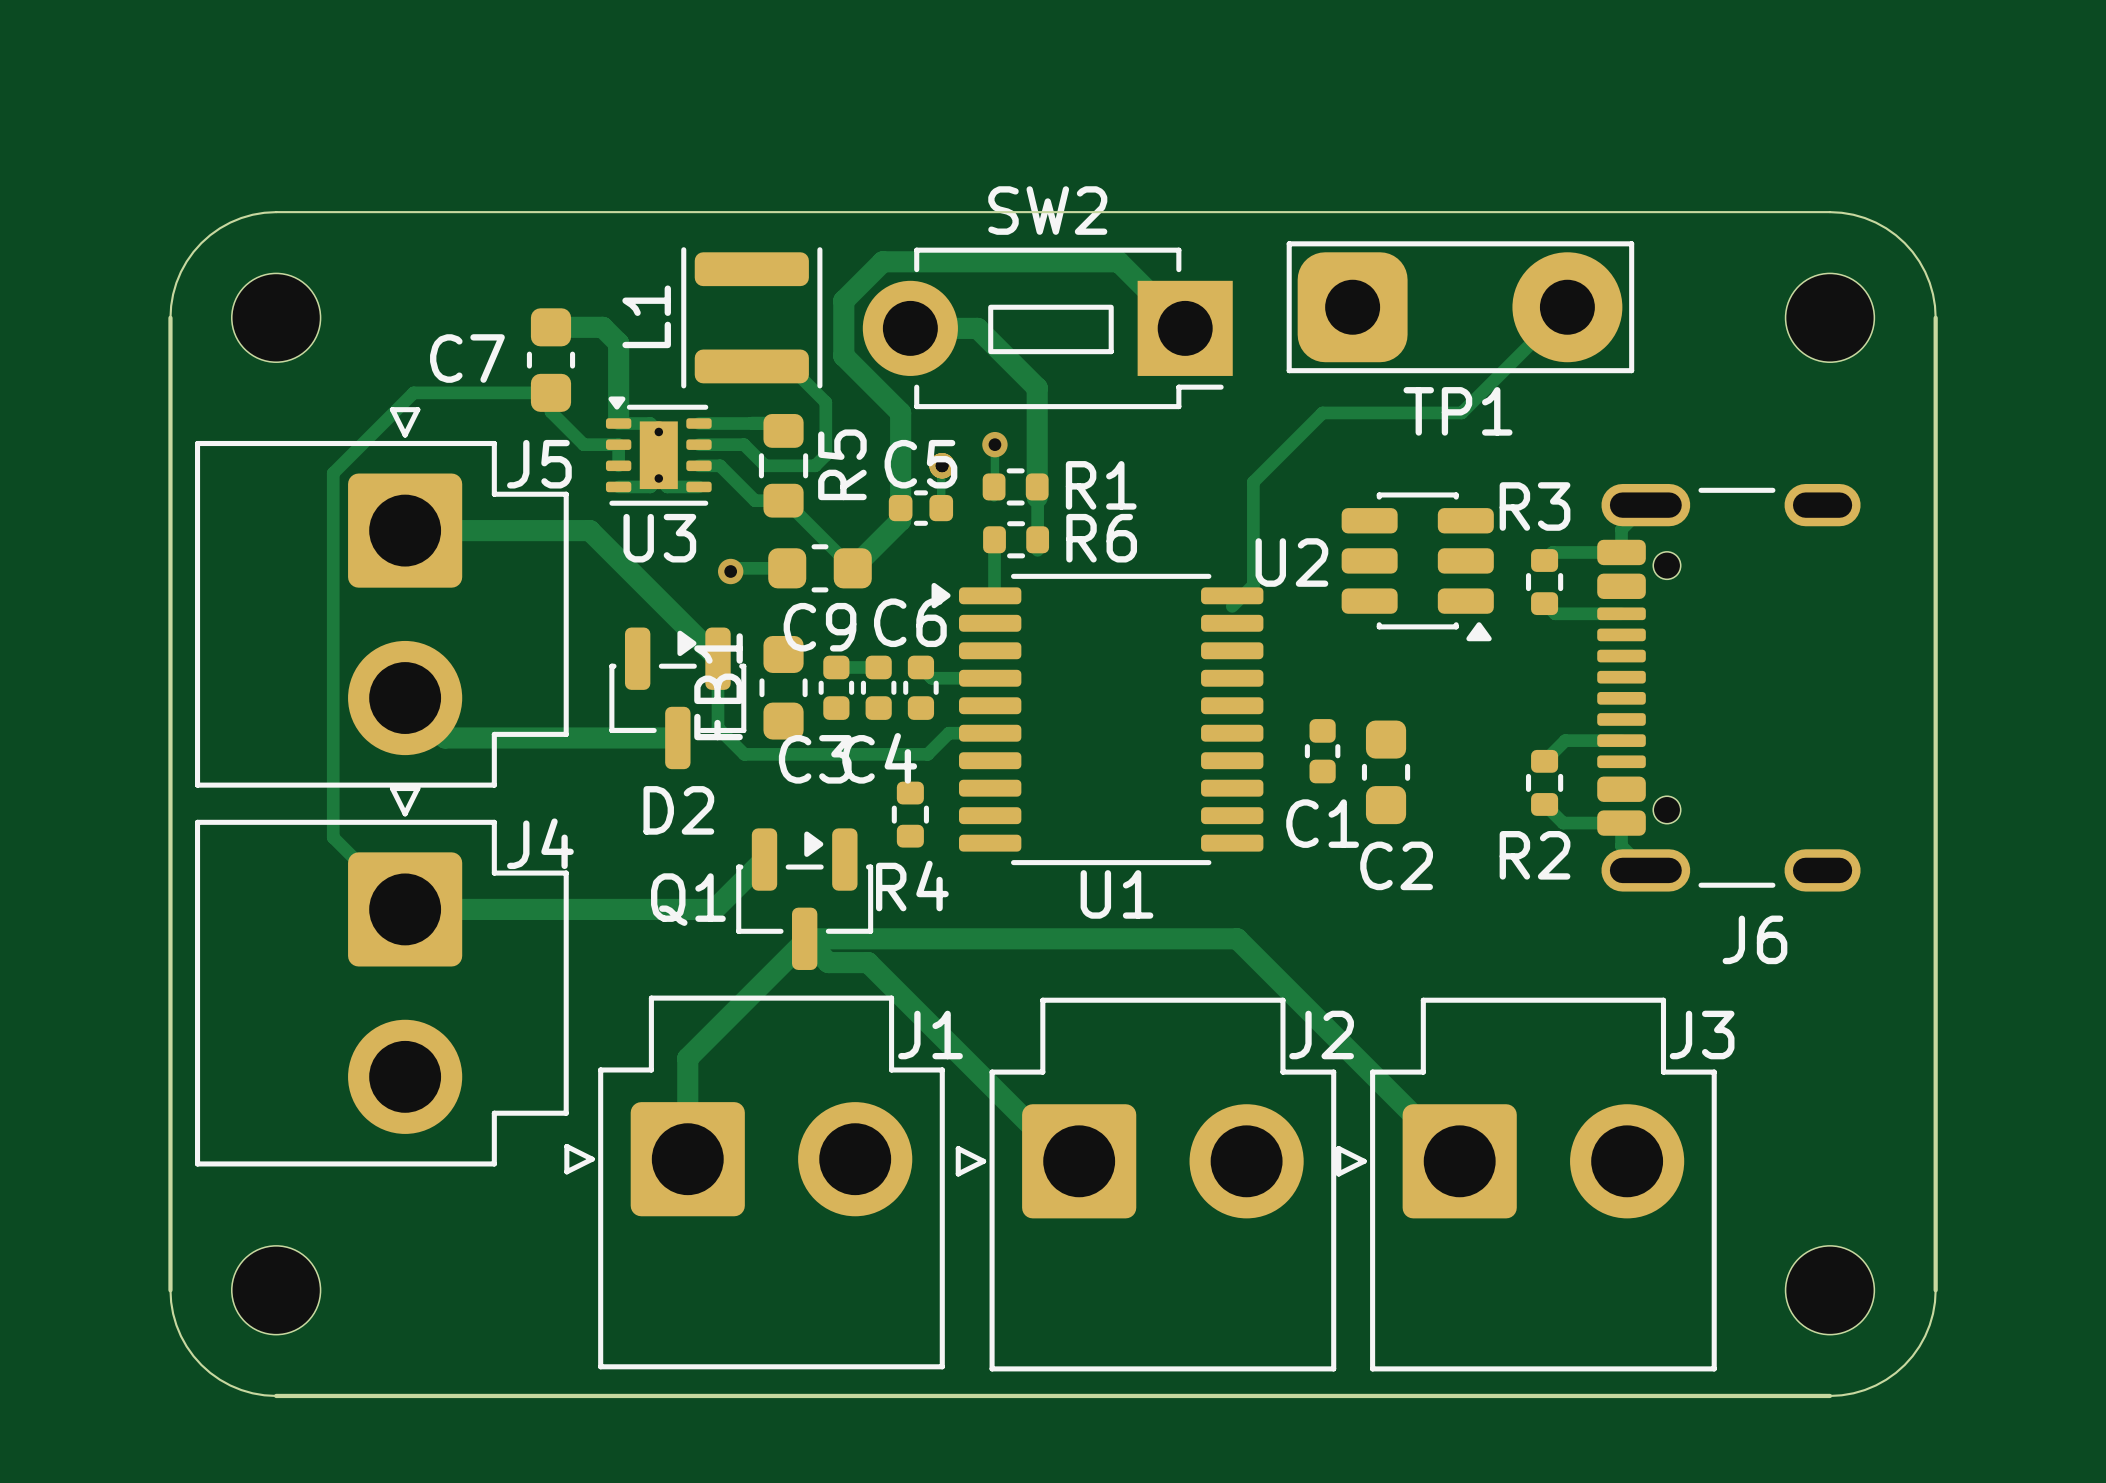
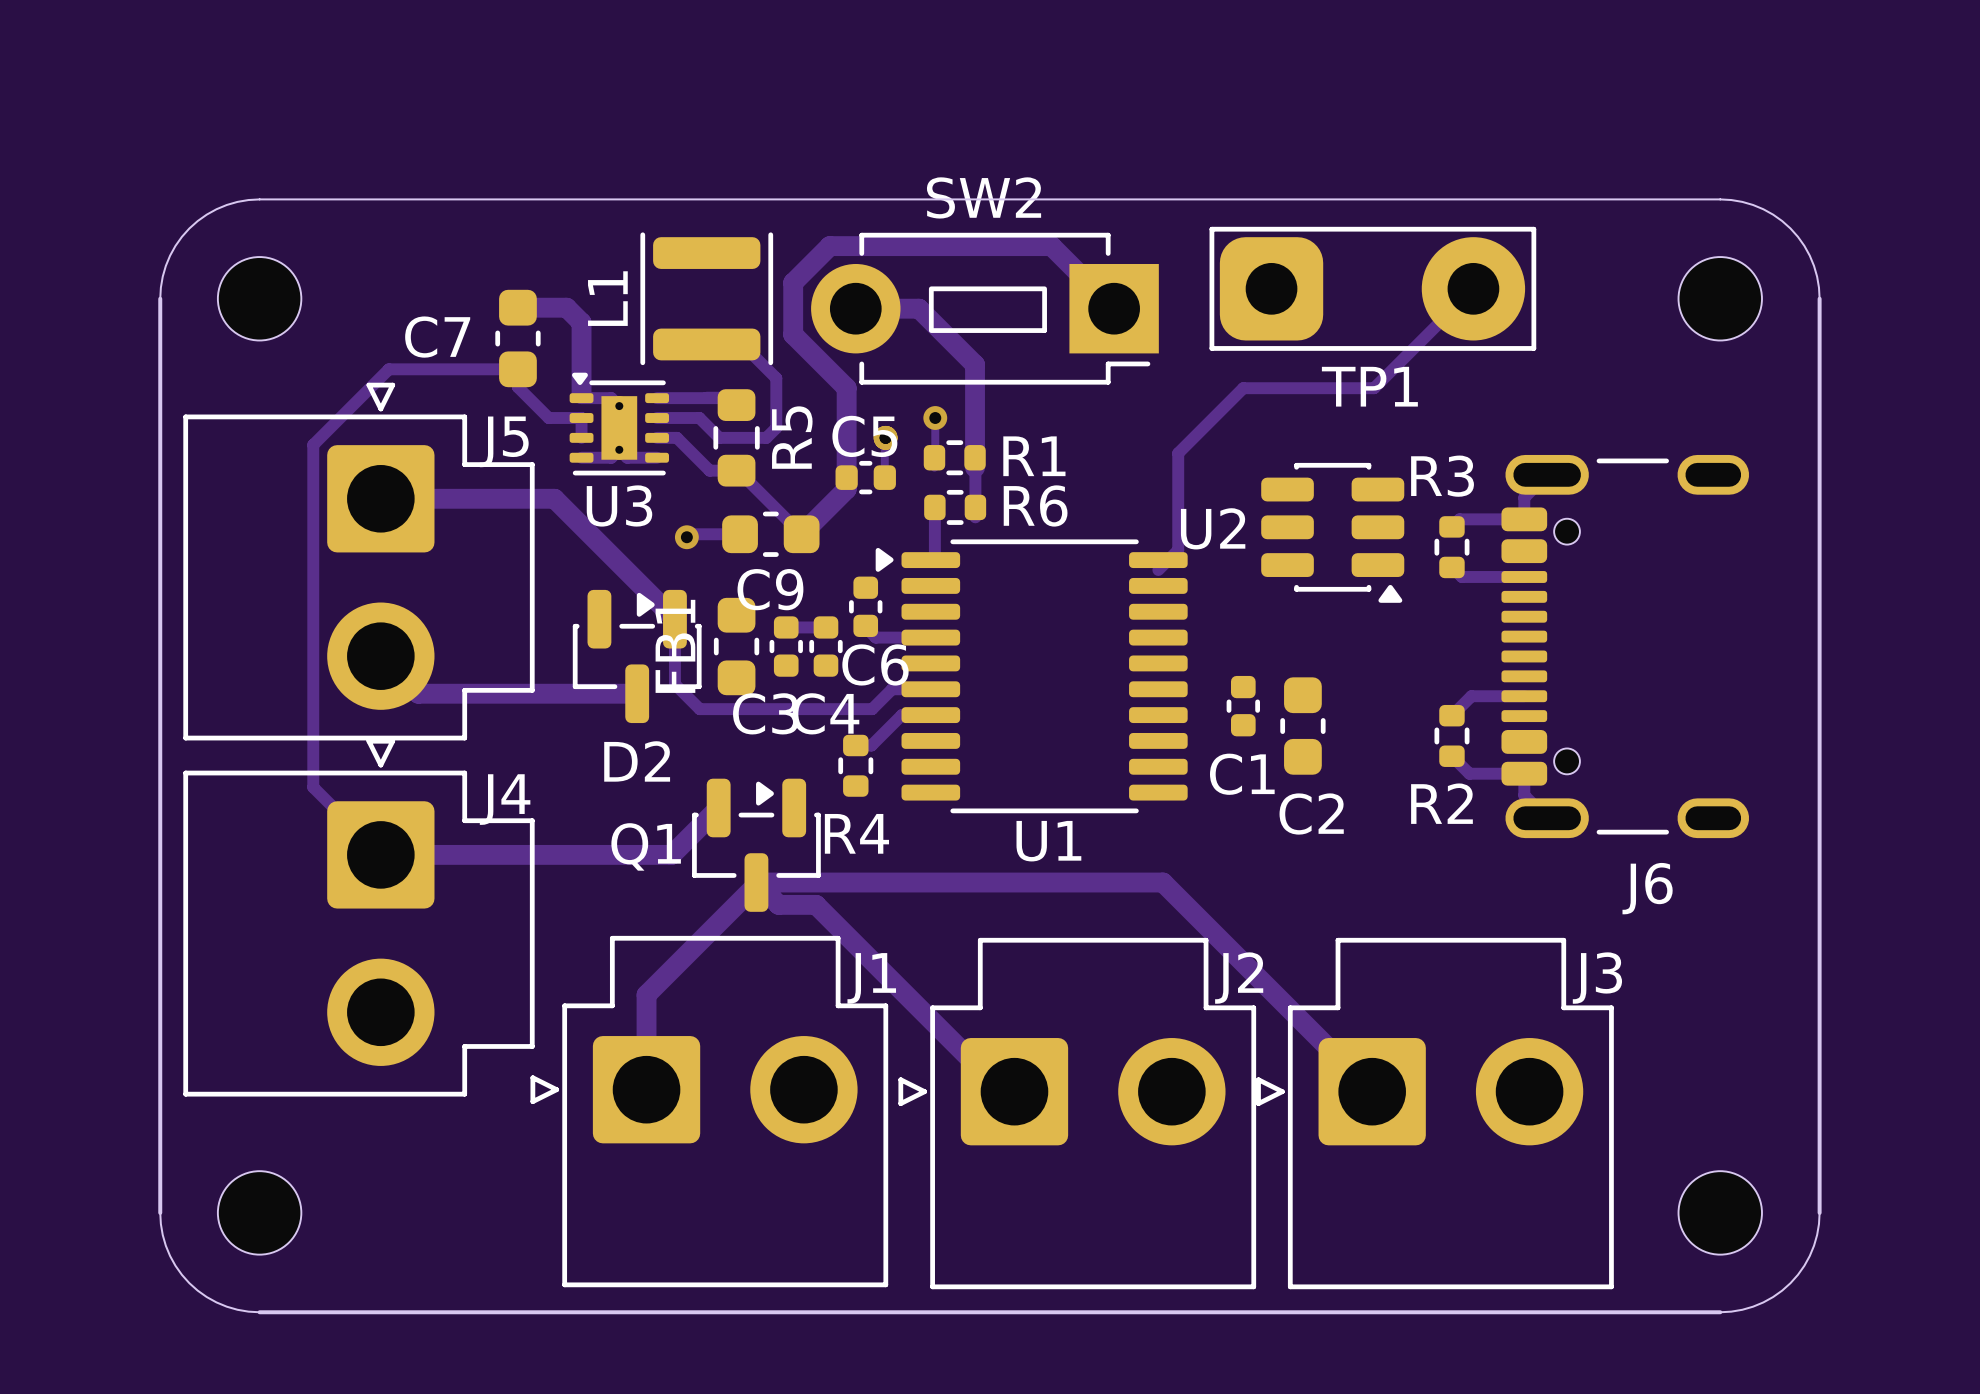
C6 name position: C6 (910, 622) -> C6 (875, 664)
C6 position: (920, 687) -> (865, 606)
track: none -> (930, 715) (901, 715) (871, 745) (855, 745)

